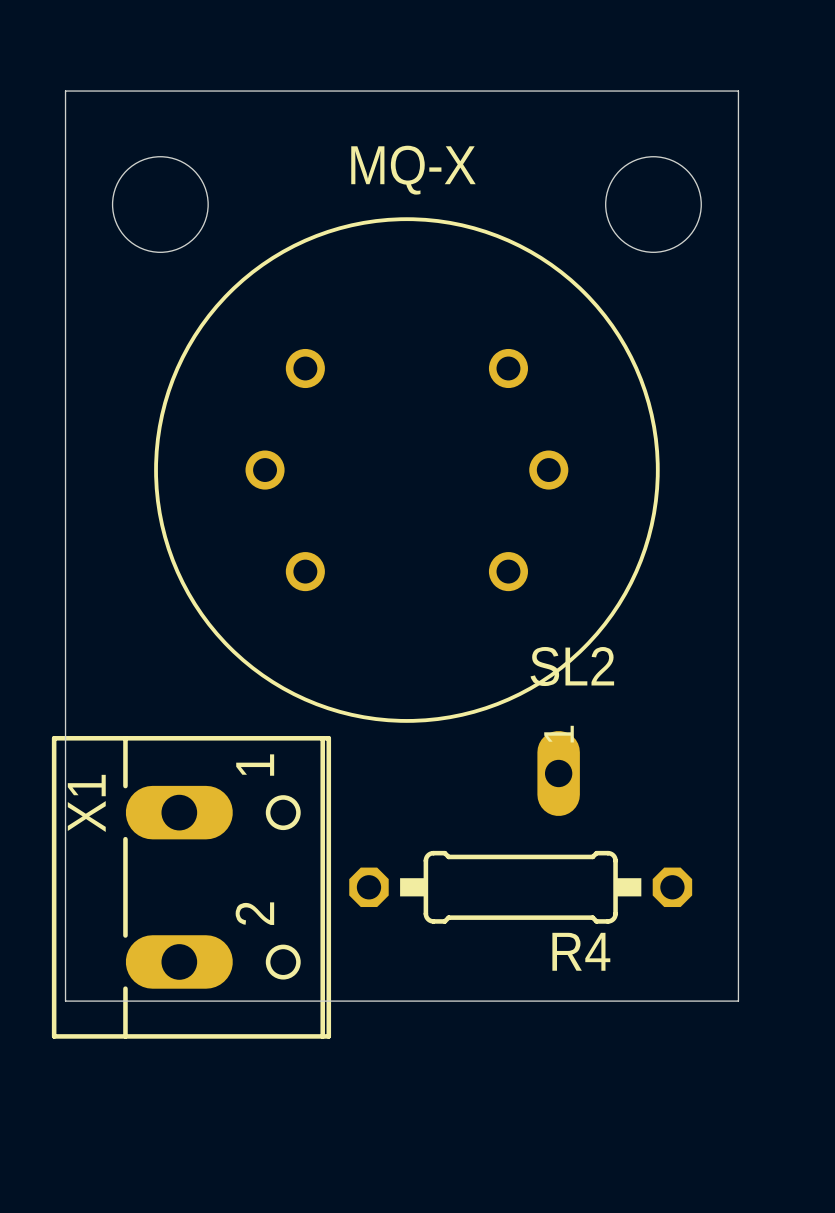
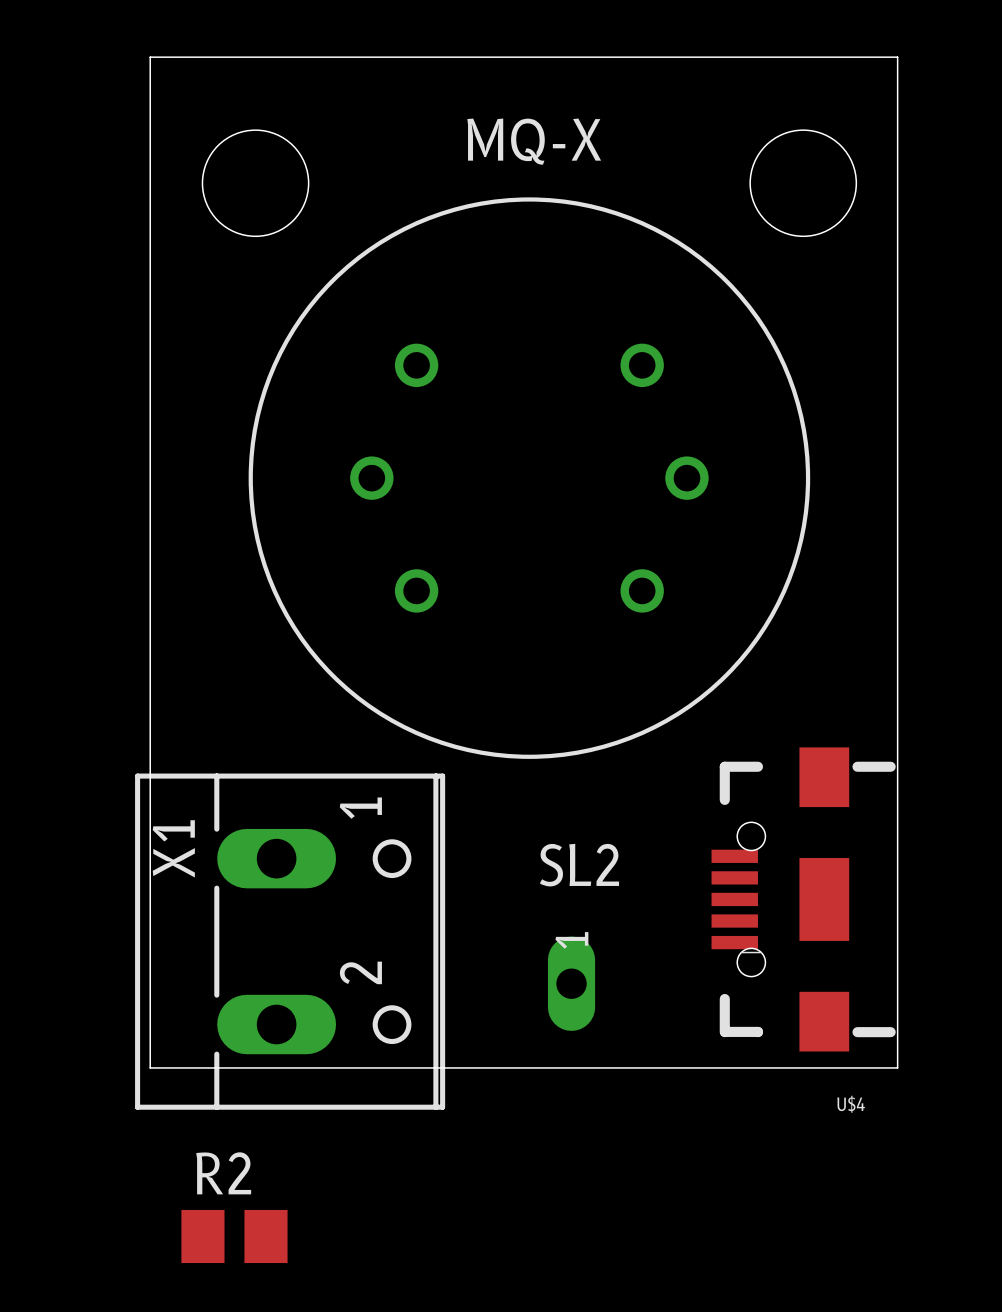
SL2 position: (558, 773) -> (571, 983)
U$4: none -> (803, 899)
R4: (520, 887) -> none
R2: none -> (234, 1236)

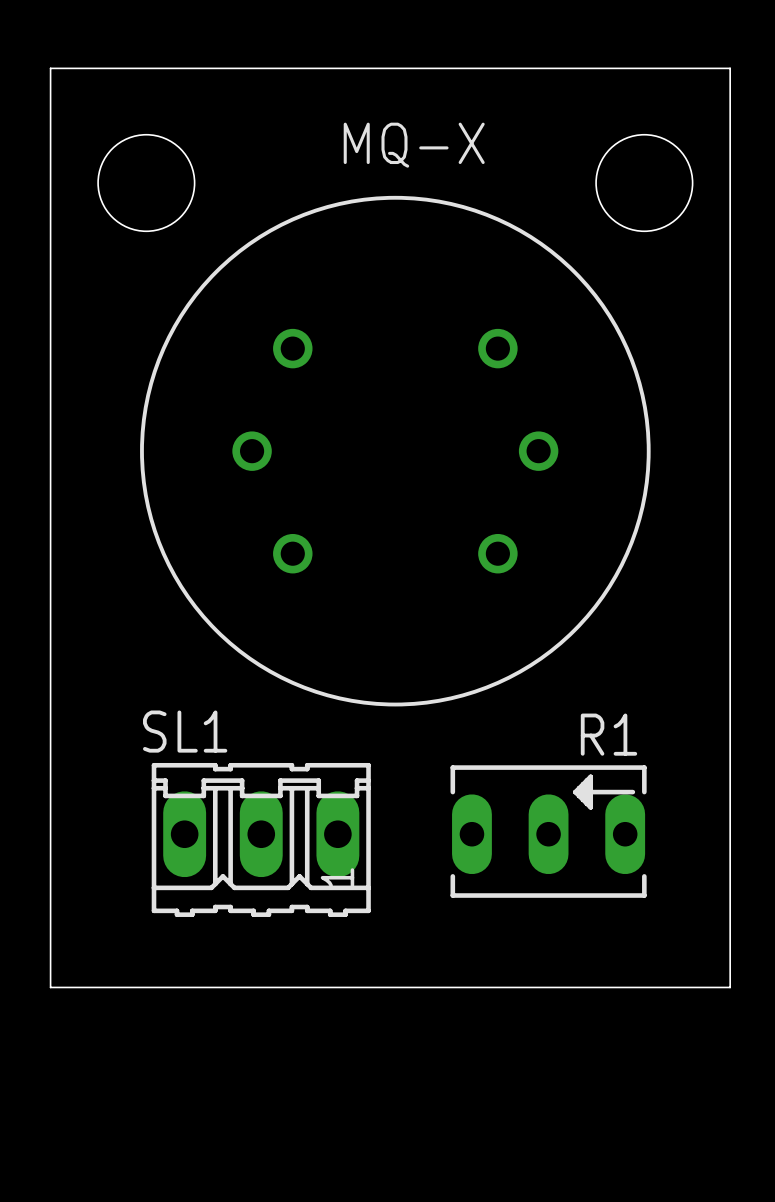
R1: none -> (548, 831)
U$4: (803, 899) -> none
SL1: none -> (261, 839)
X1: (290, 941) -> none
SL2: (571, 983) -> none
R2: (234, 1236) -> none

